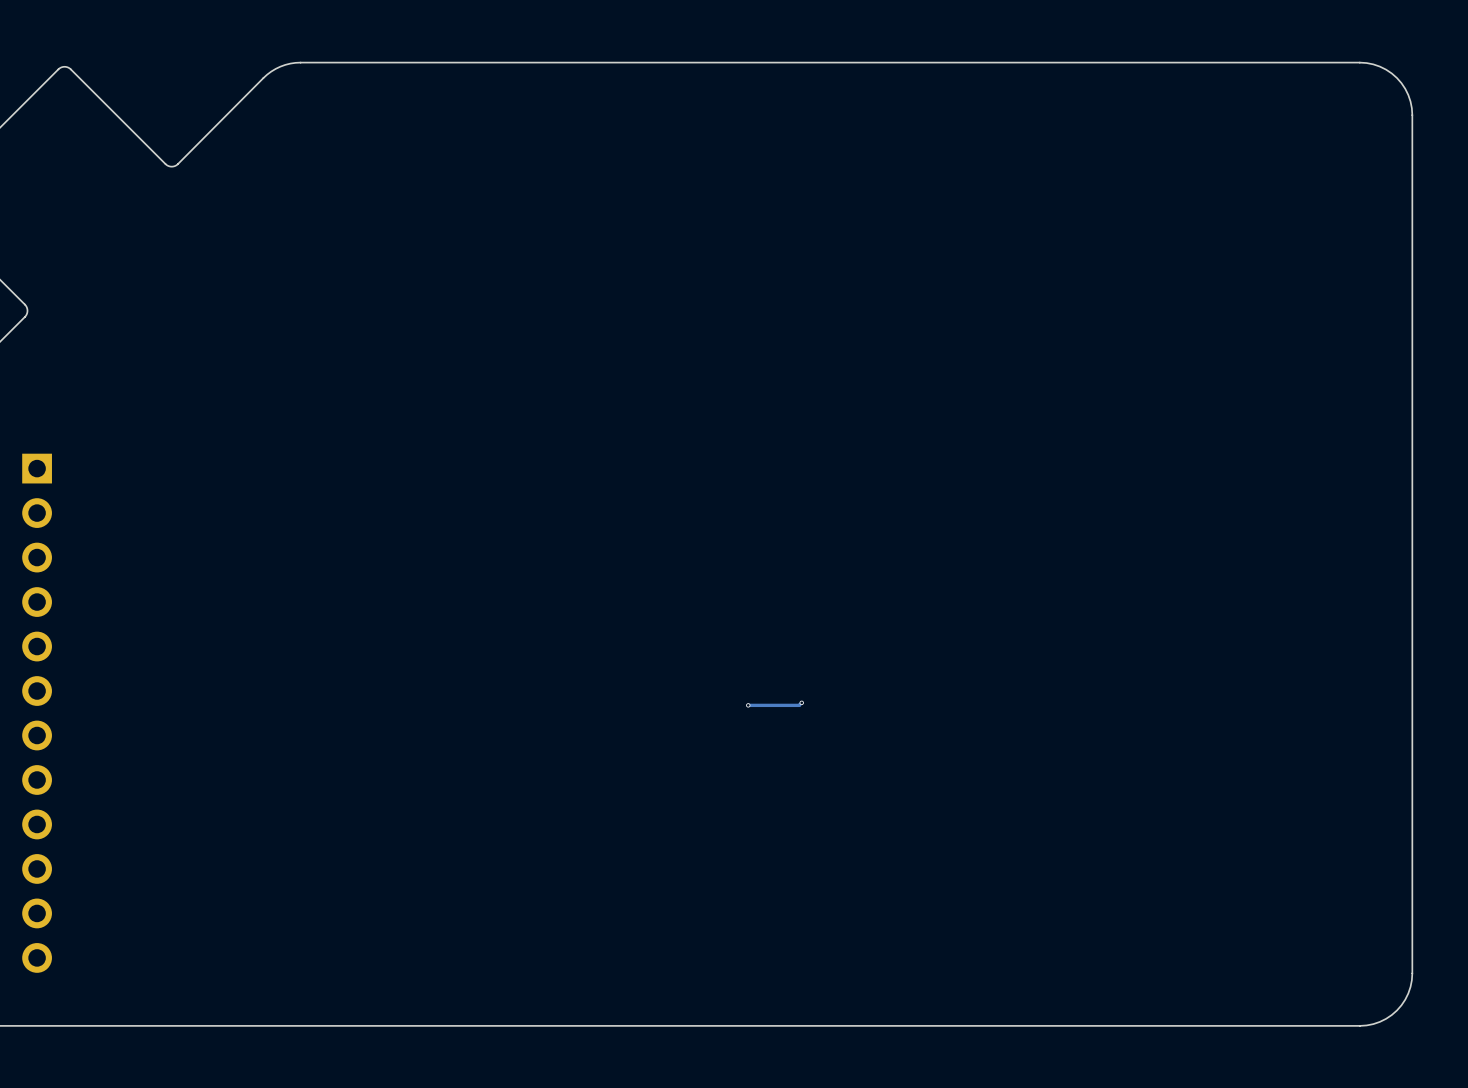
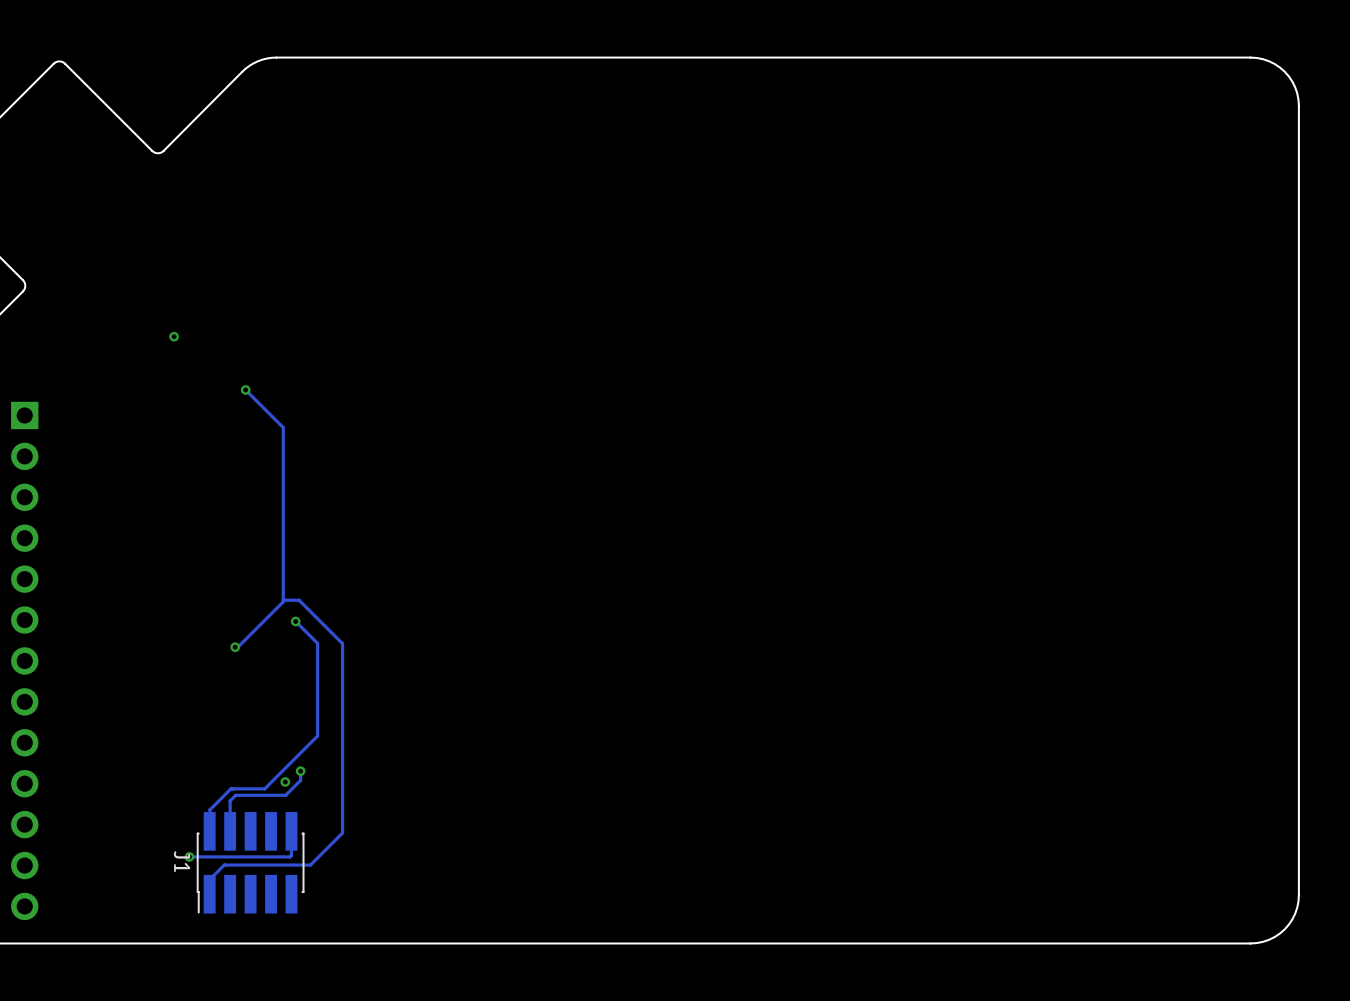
via: none -> (174, 336)
track: none -> (245, 389) (283, 427) (283, 601) (237, 647) (235, 647)
via: none -> (245, 389)
part footprint: [22, 453, 52, 973] -> [11, 401, 39, 921]
track: none -> (283, 600) (299, 600) (342, 643) (342, 832) (310, 865) (224, 865) (209, 879) (209, 894)
track: none -> (295, 621) (317, 643) (317, 736) (264, 788) (230, 788) (210, 809) (210, 831)
via: none -> (295, 621)
track: (801, 702) (799, 705) (748, 705) -> none
via: (801, 702) -> none
via: none -> (235, 647)
via: (748, 705) -> none
track: none -> (300, 771) (300, 780) (285, 795) (235, 795) (230, 800) (230, 831)
via: none -> (300, 771)
via: none -> (285, 782)
track: none -> (291, 831) (289, 856) (189, 856)
via: none -> (189, 856)
J1: none -> (250, 862)

